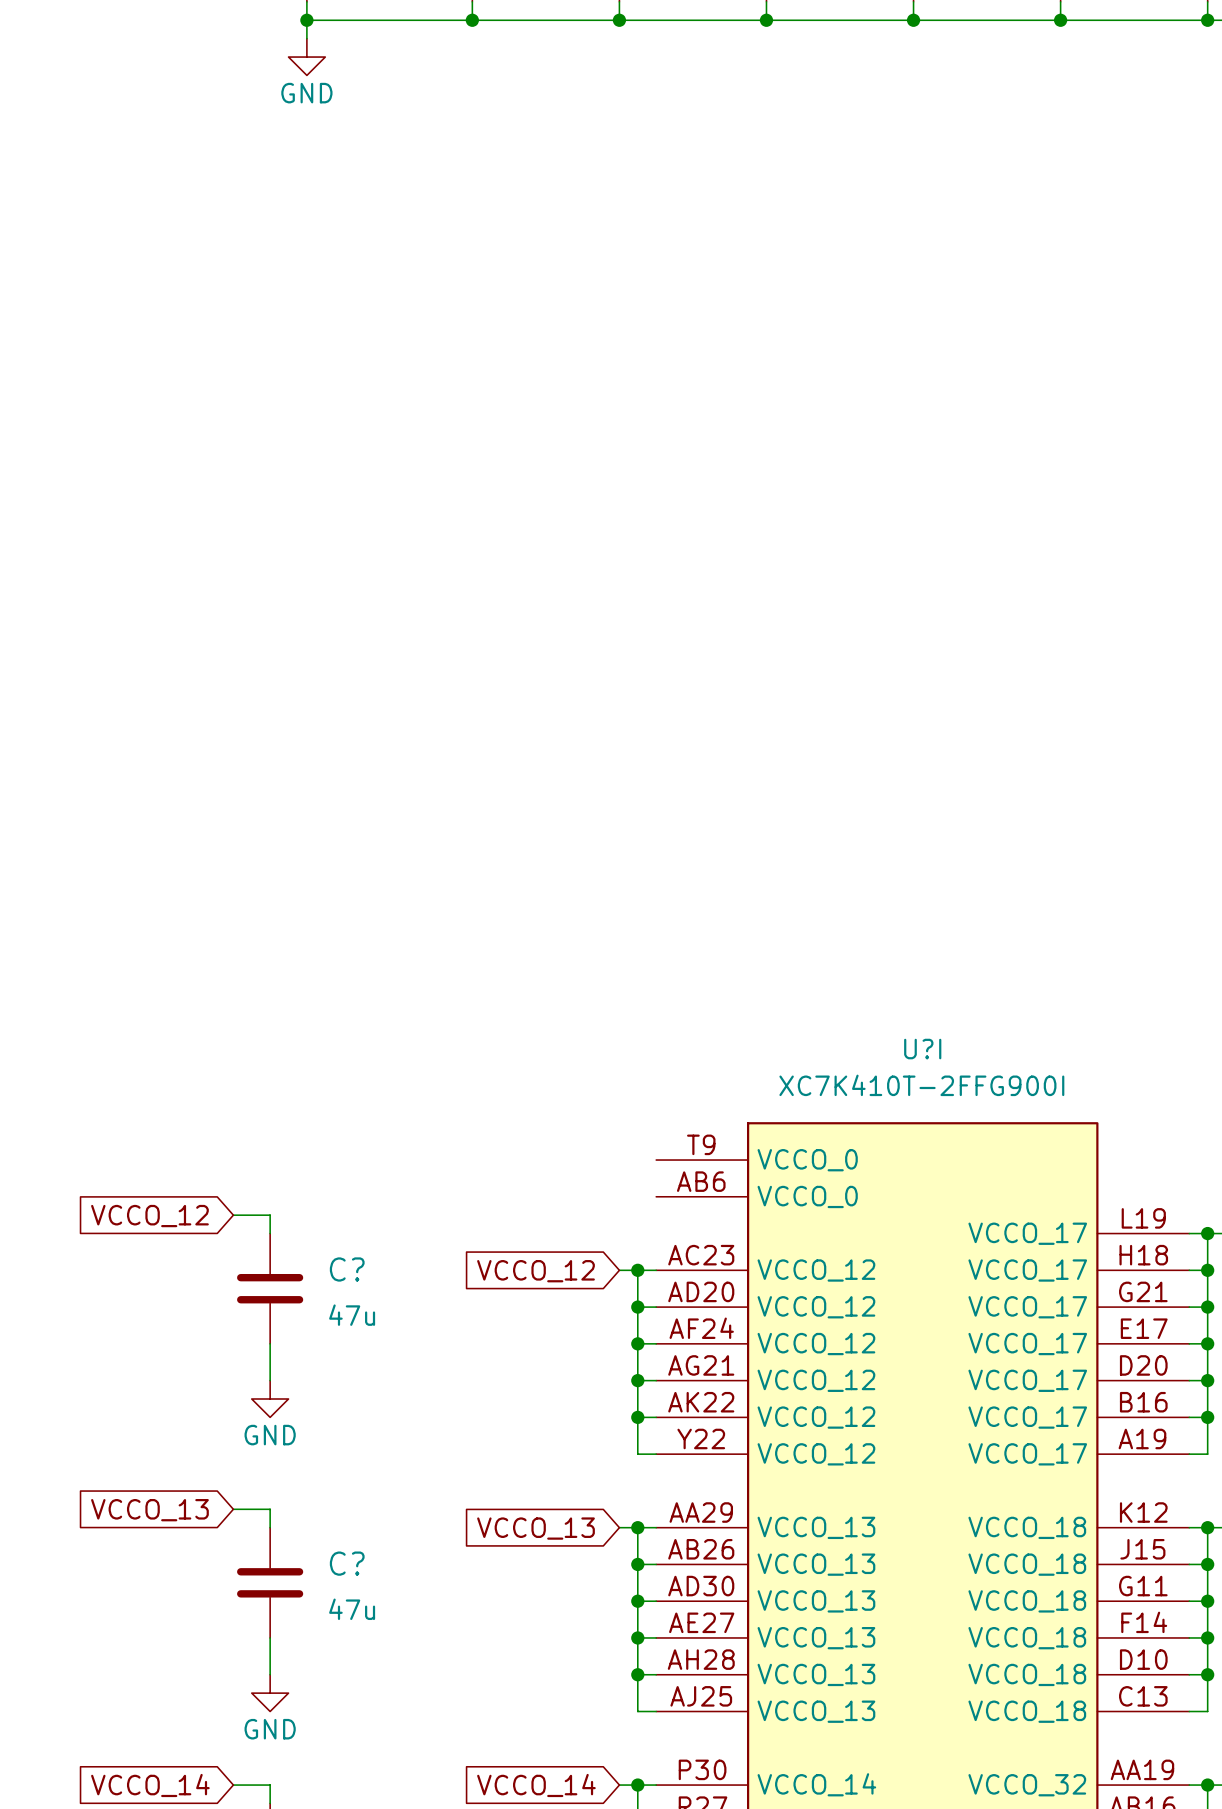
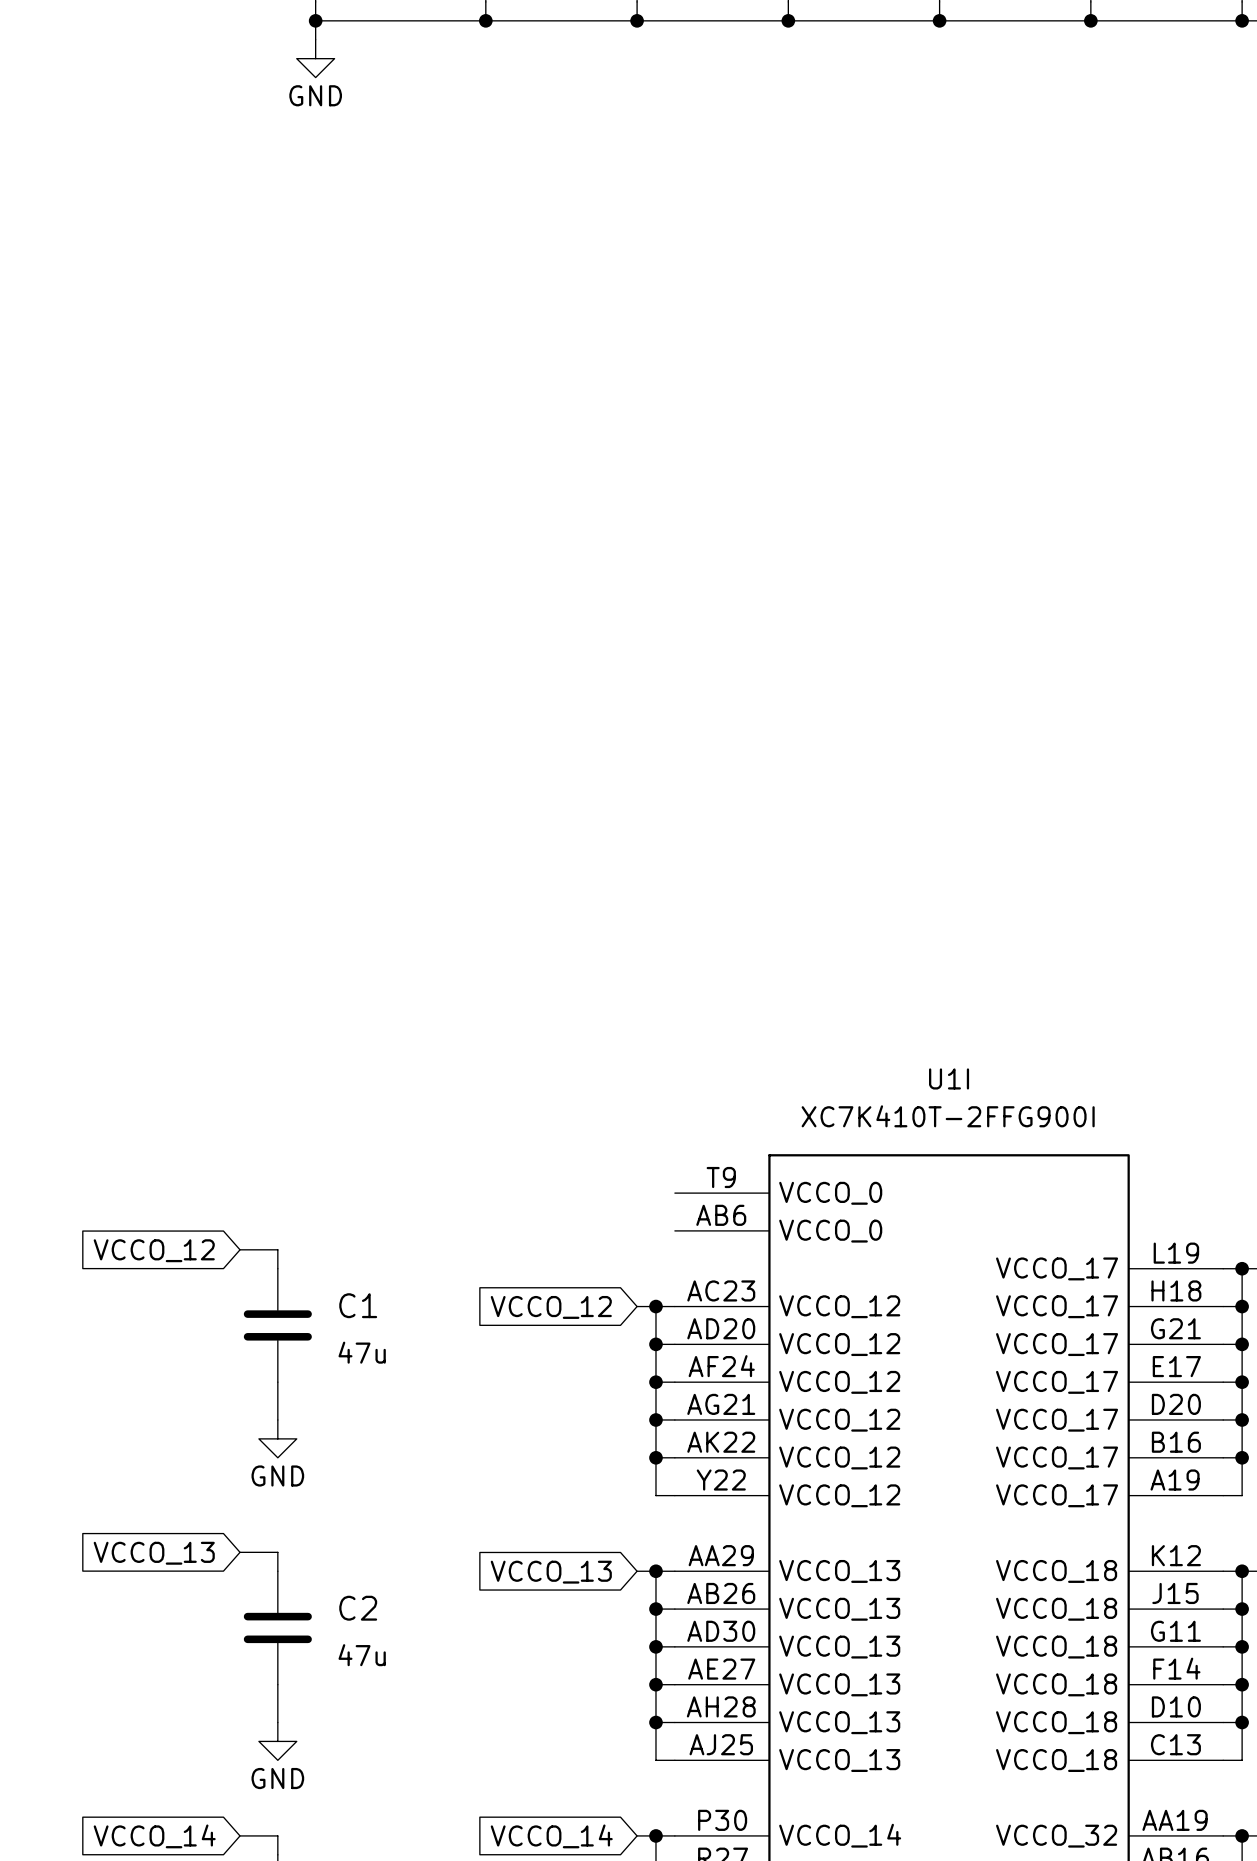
U?I name: U?I (922, 1049) -> U1I (949, 1078)
C? name: C? (347, 1269) -> C1 (358, 1305)
C? name: C? (347, 1563) -> C2 (358, 1608)

